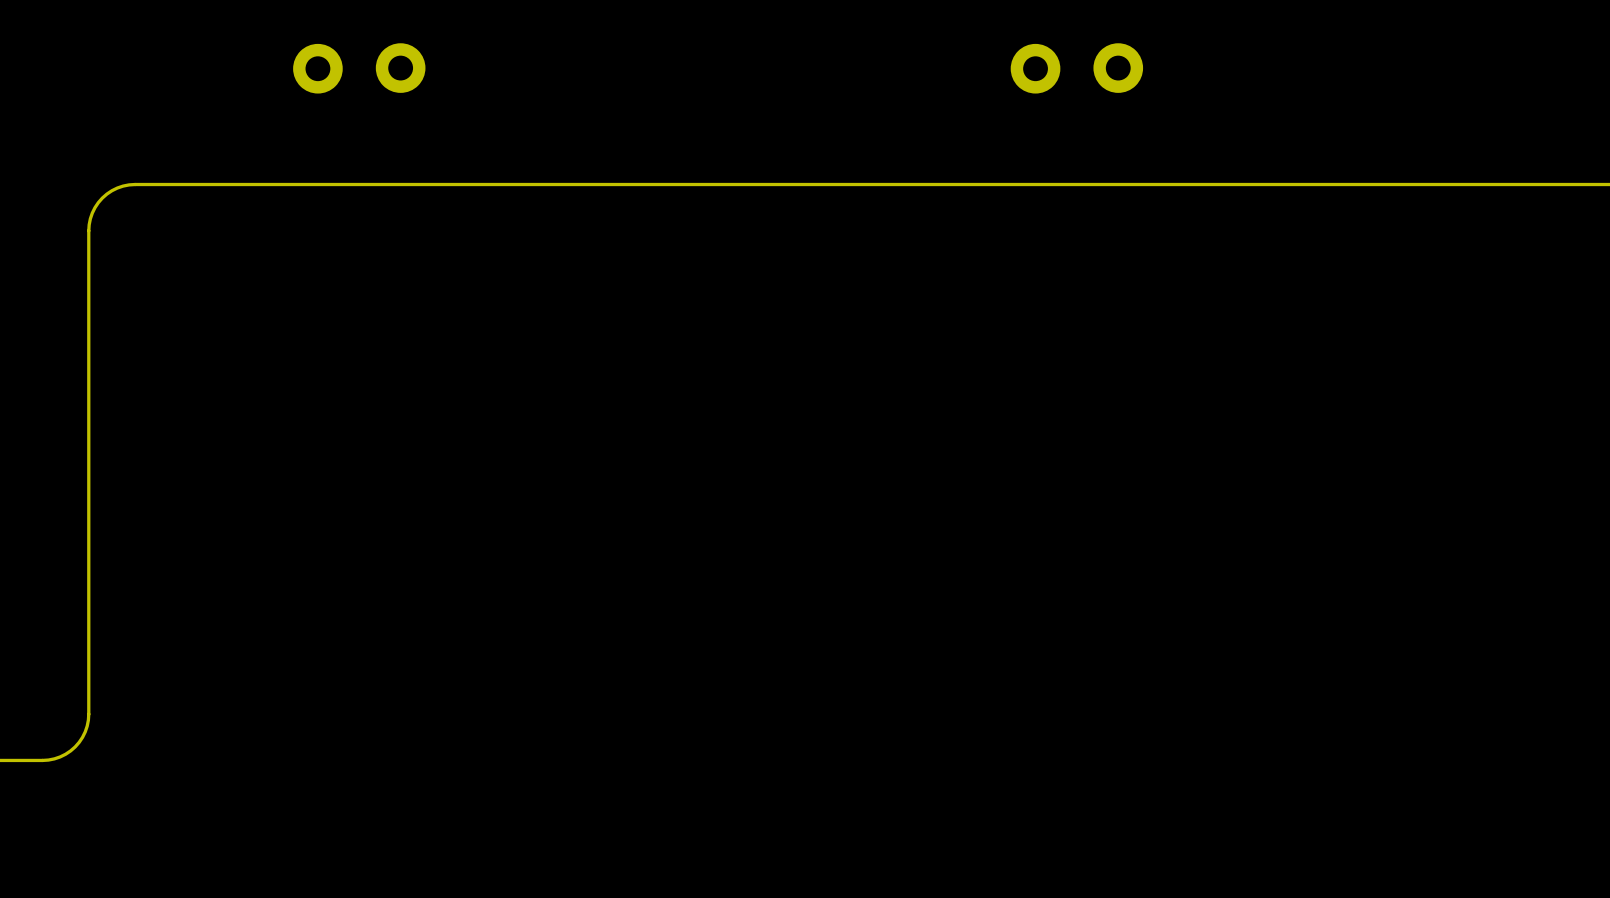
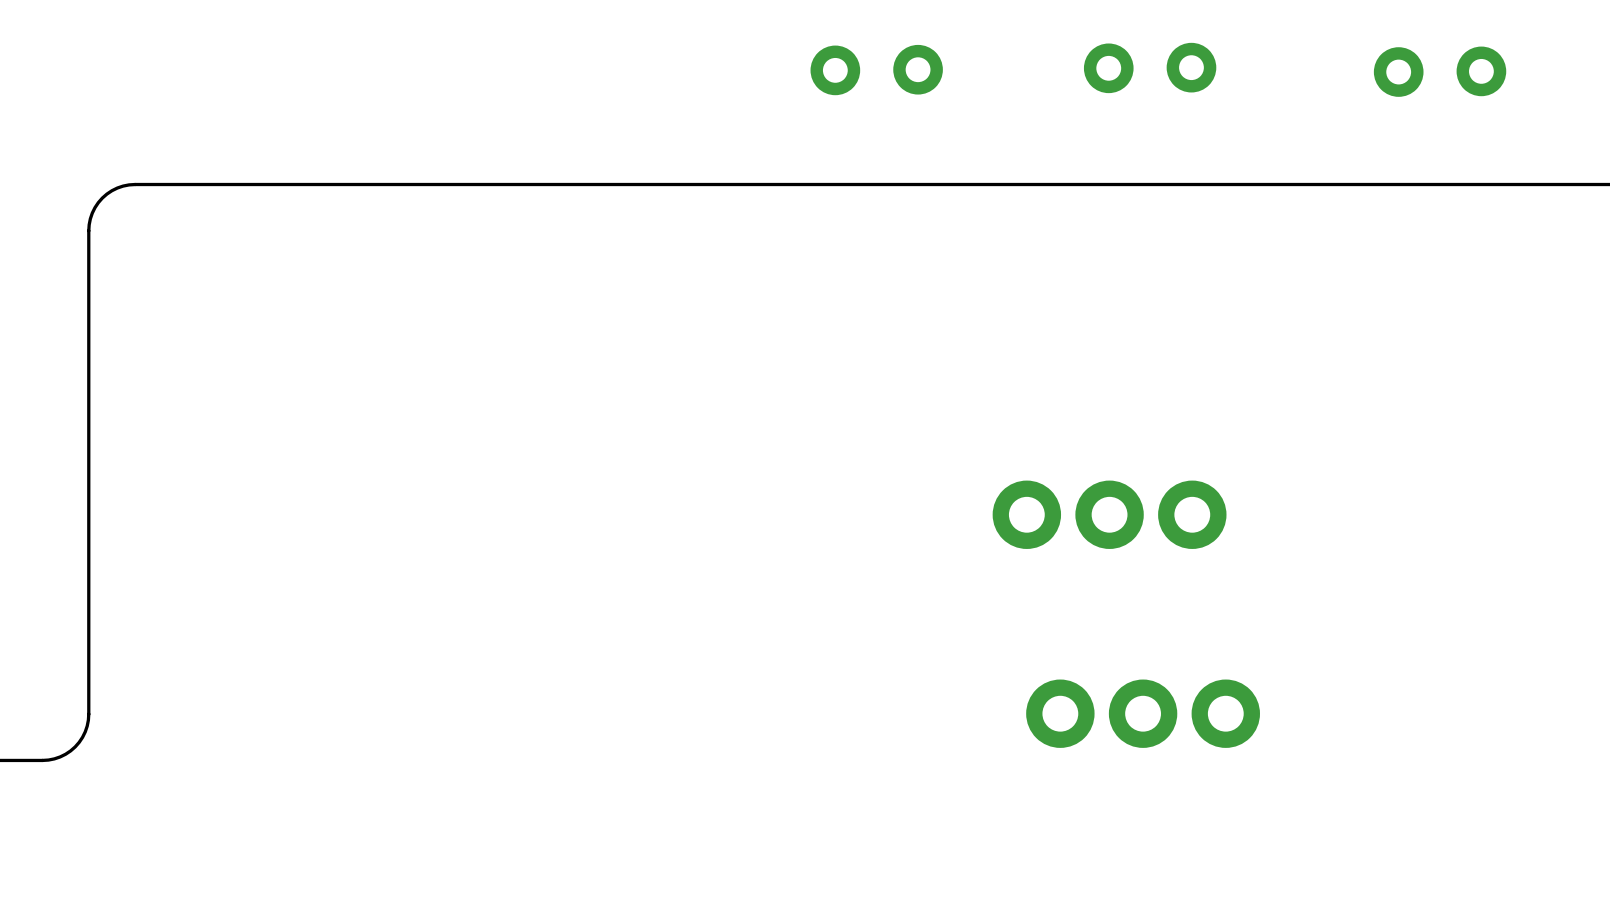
part: (359, 68) -> none
part position: (1076, 68) -> (1150, 67)
part: none -> (876, 70)
part: none -> (1440, 71)
part: none -> (1109, 514)
part: none -> (1143, 713)

